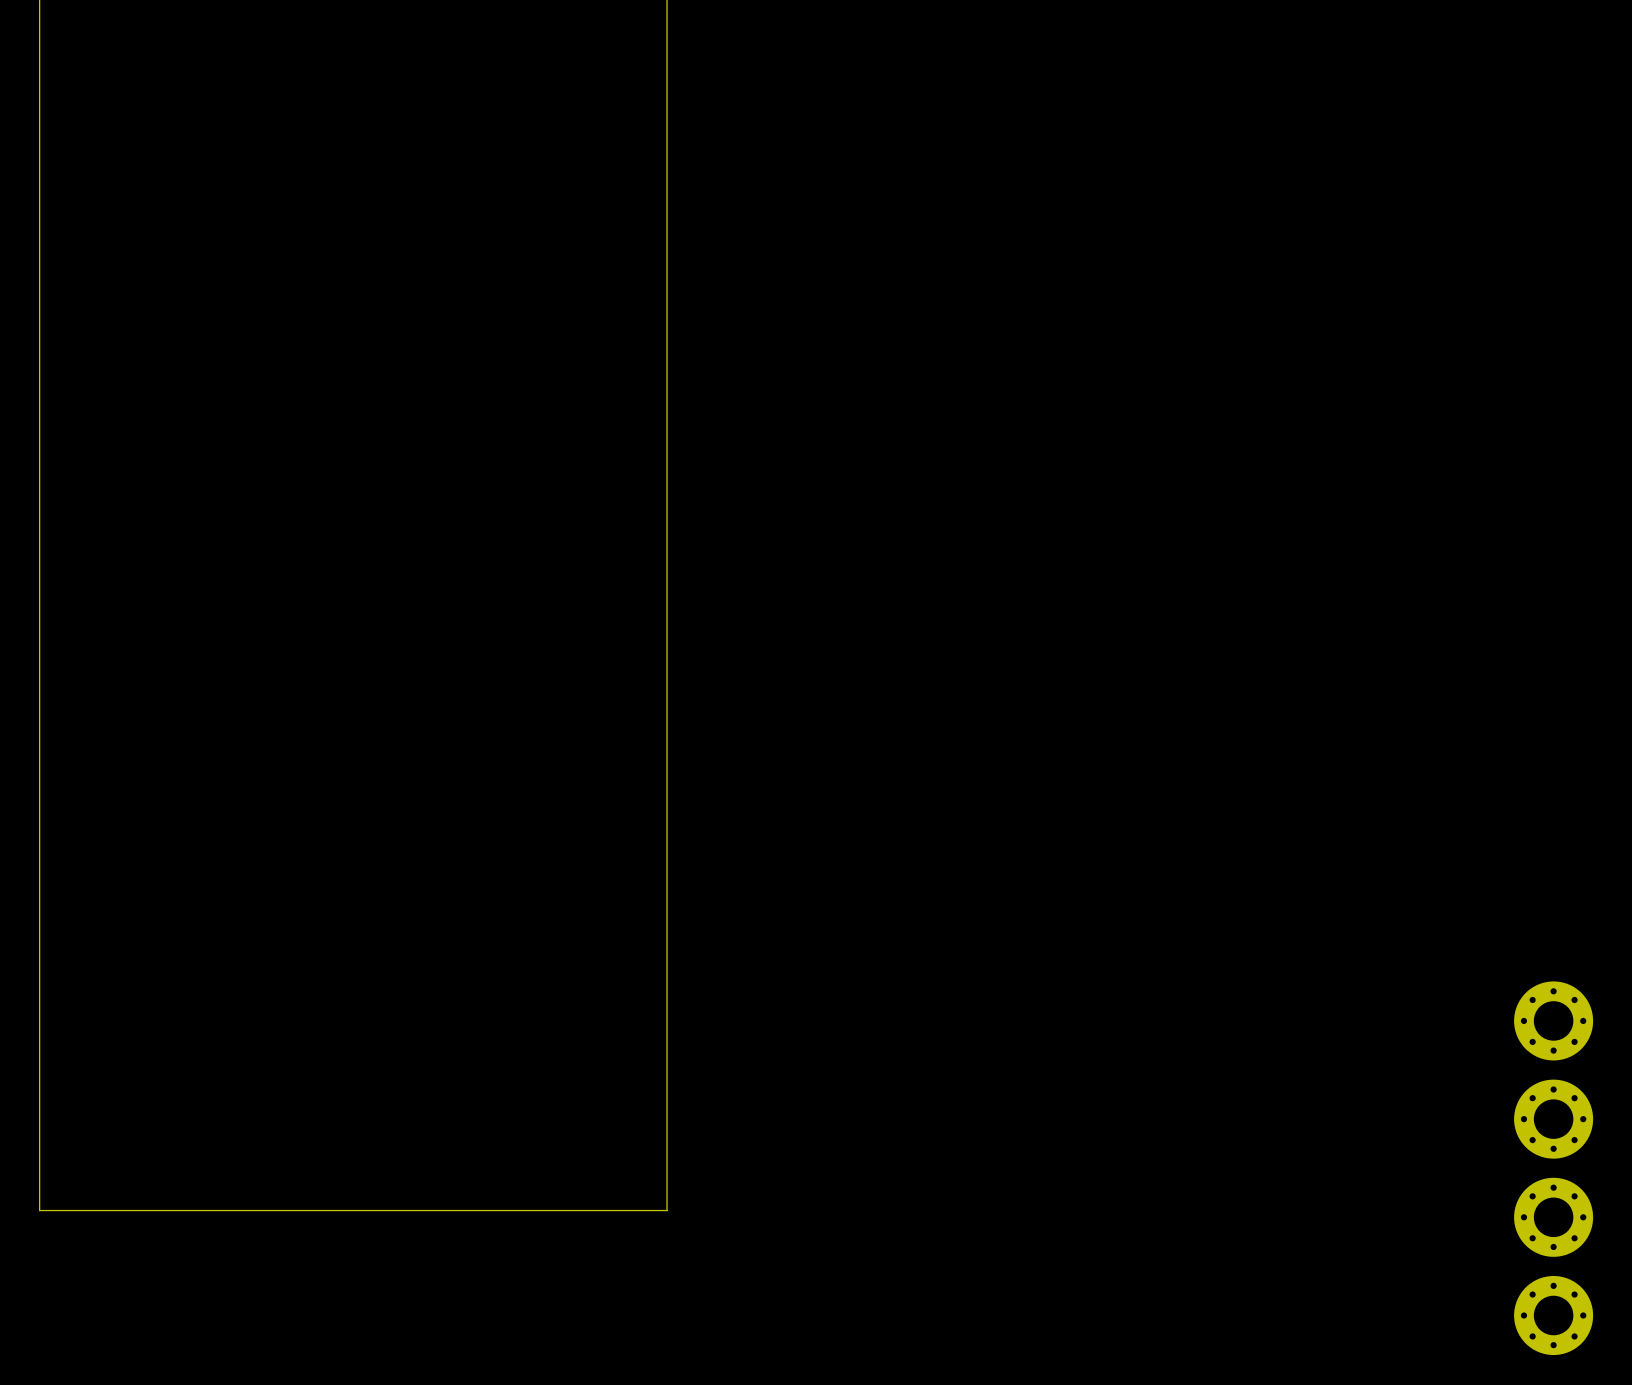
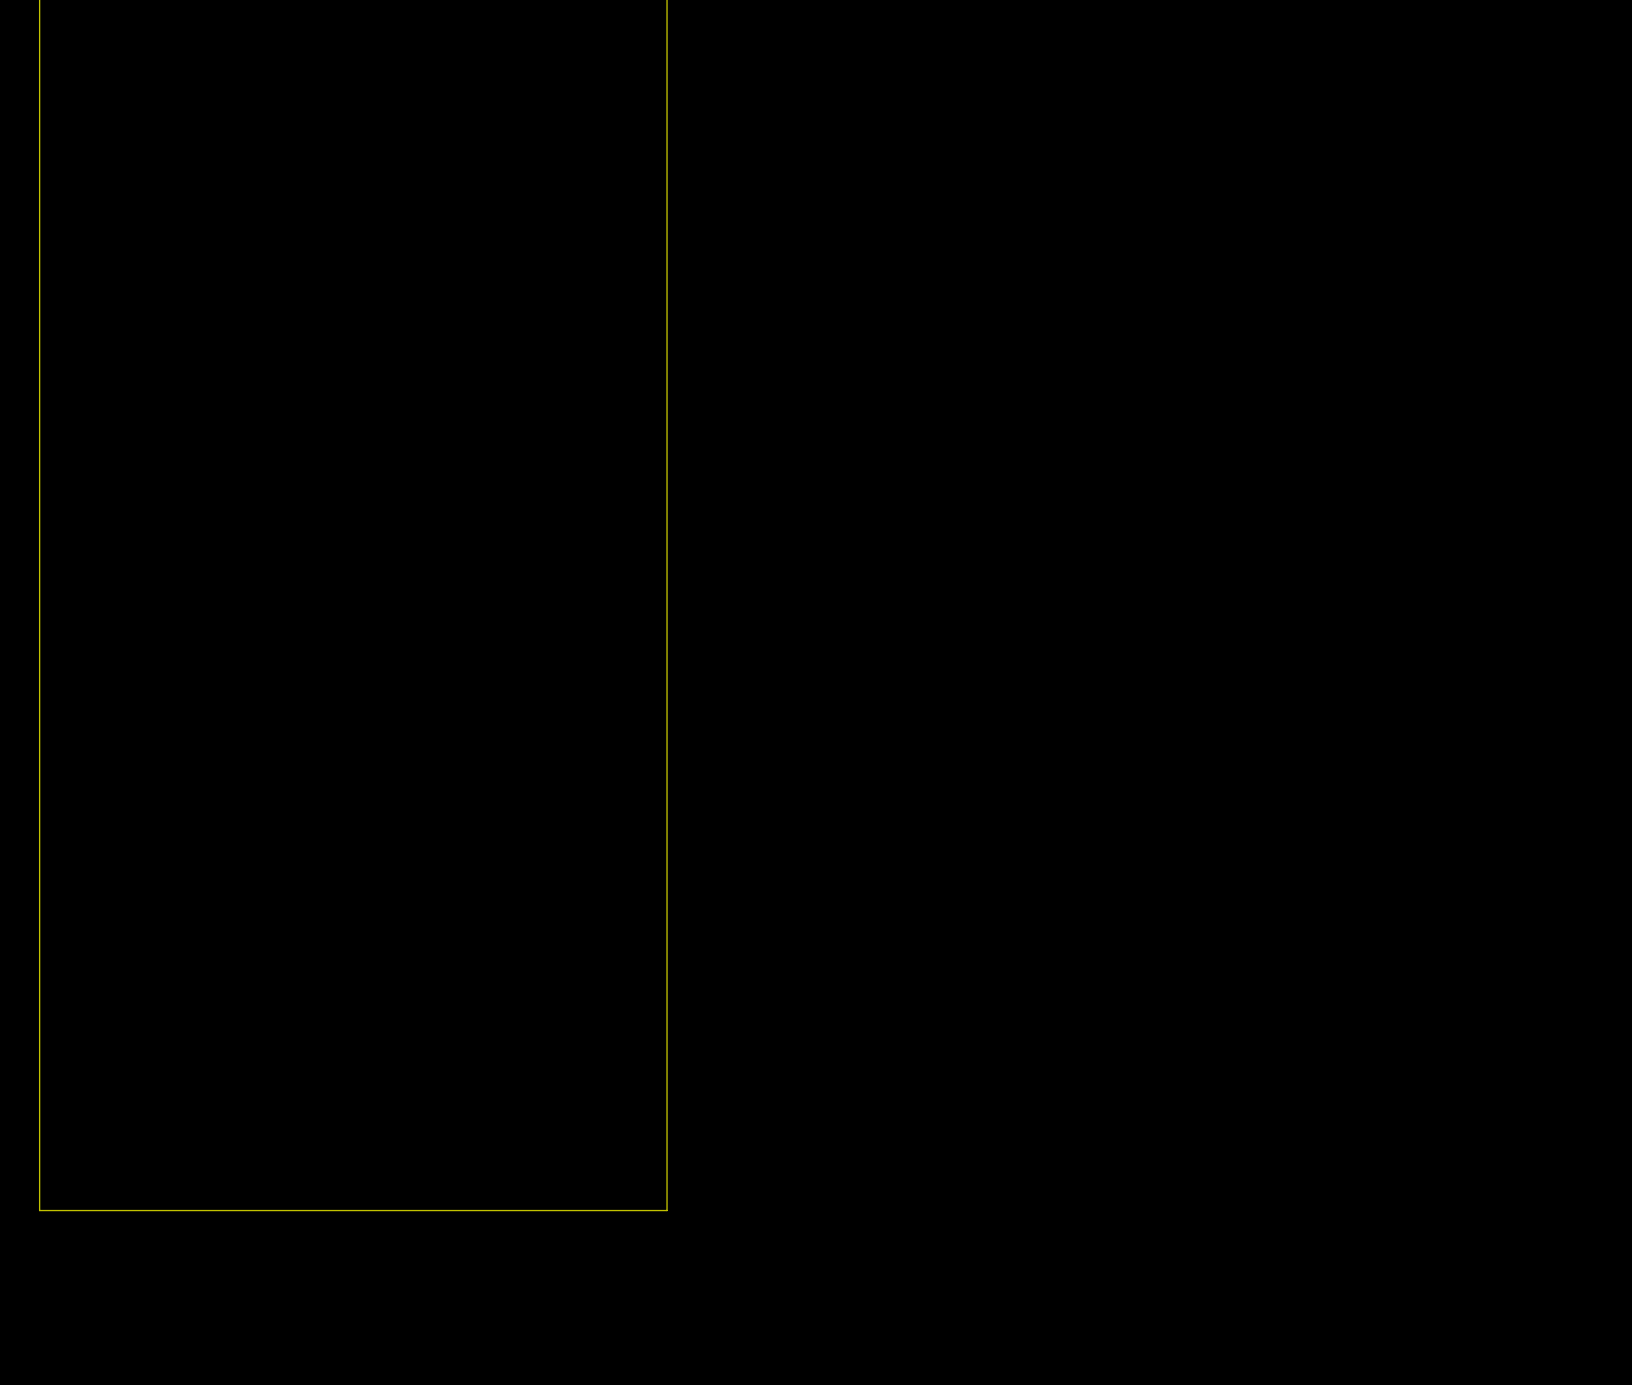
part: (1553, 1020) -> none
part: (1553, 1119) -> none
part: (1553, 1217) -> none
part: (1553, 1315) -> none

